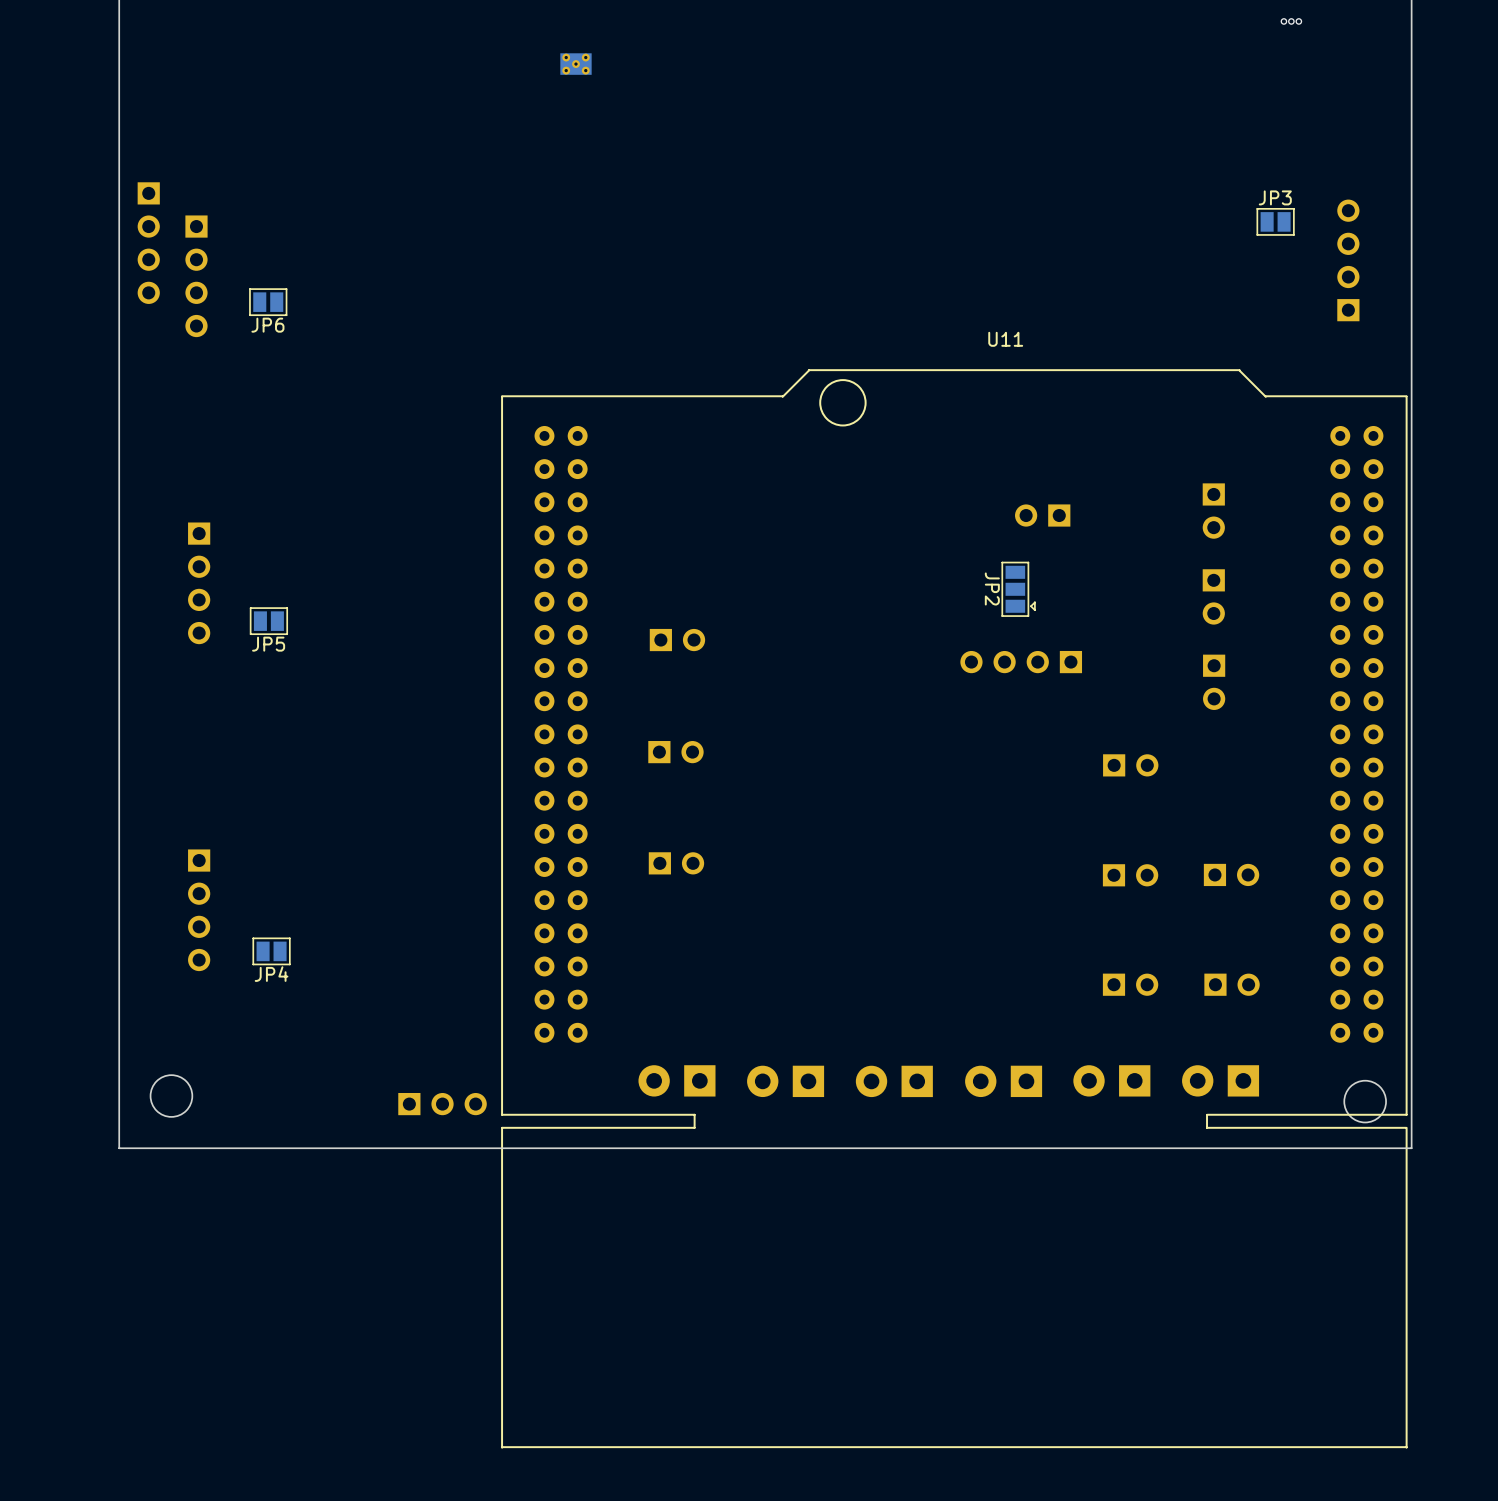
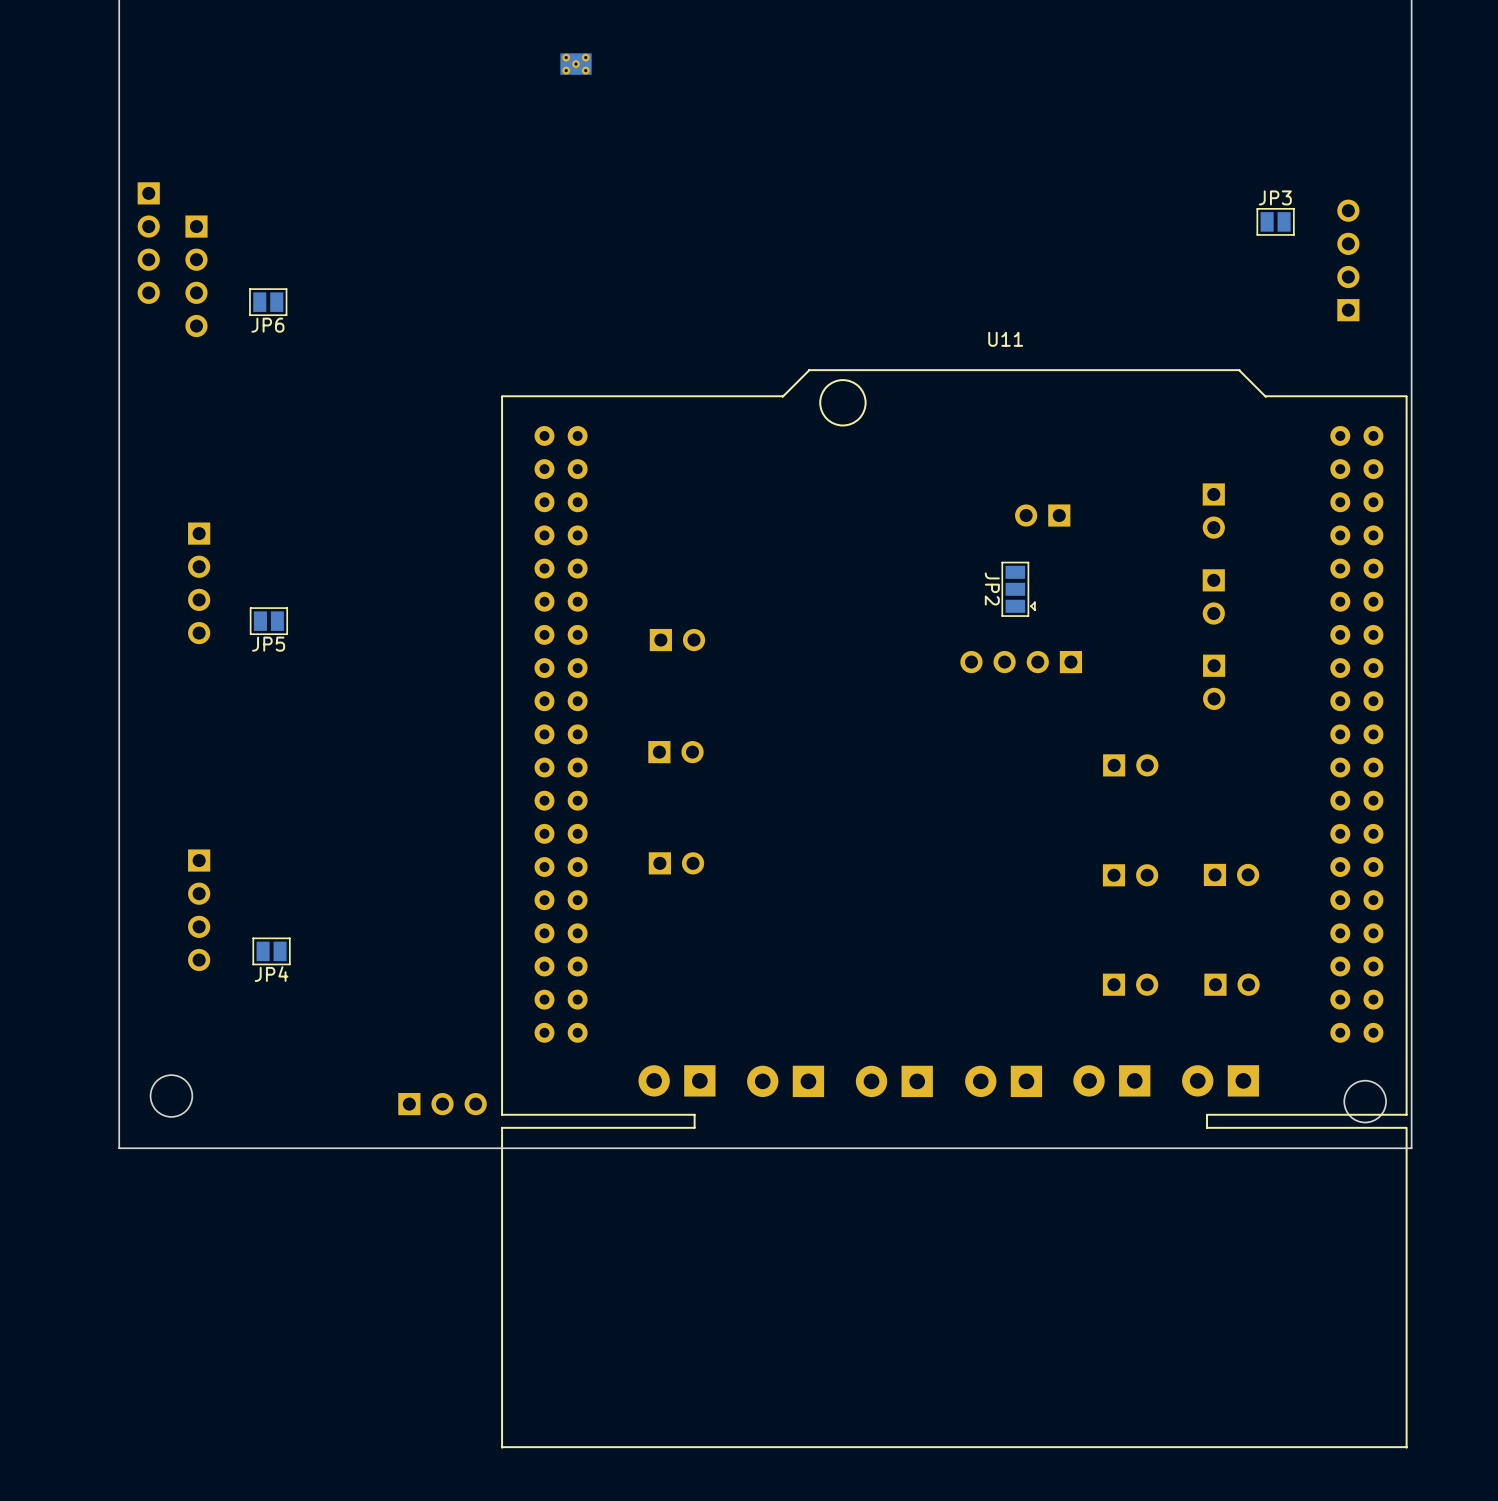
via: (1283, 21) -> none
via: (1291, 21) -> none
via: (1298, 21) -> none

